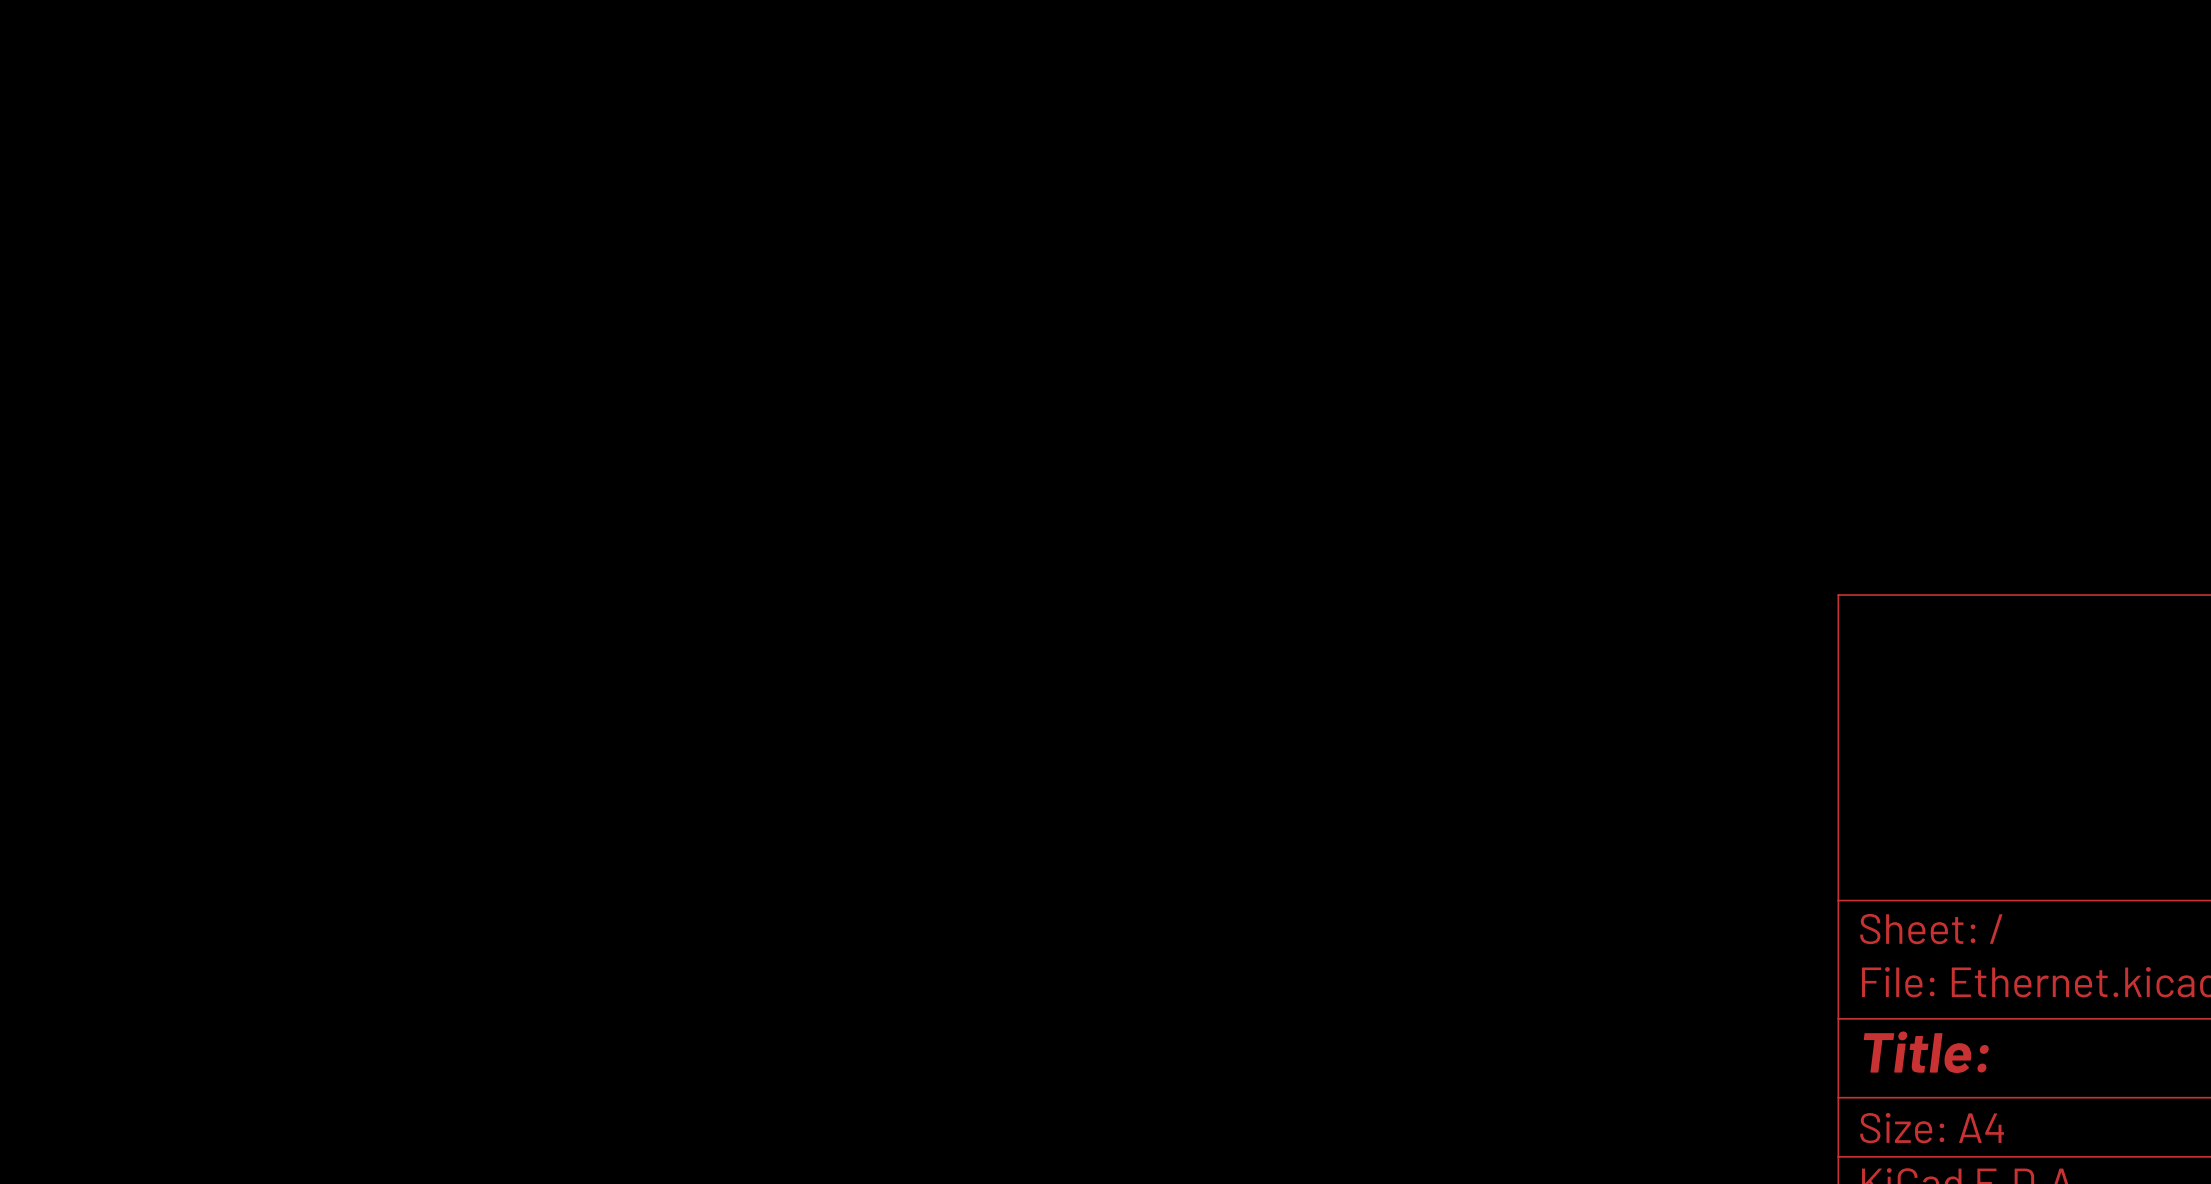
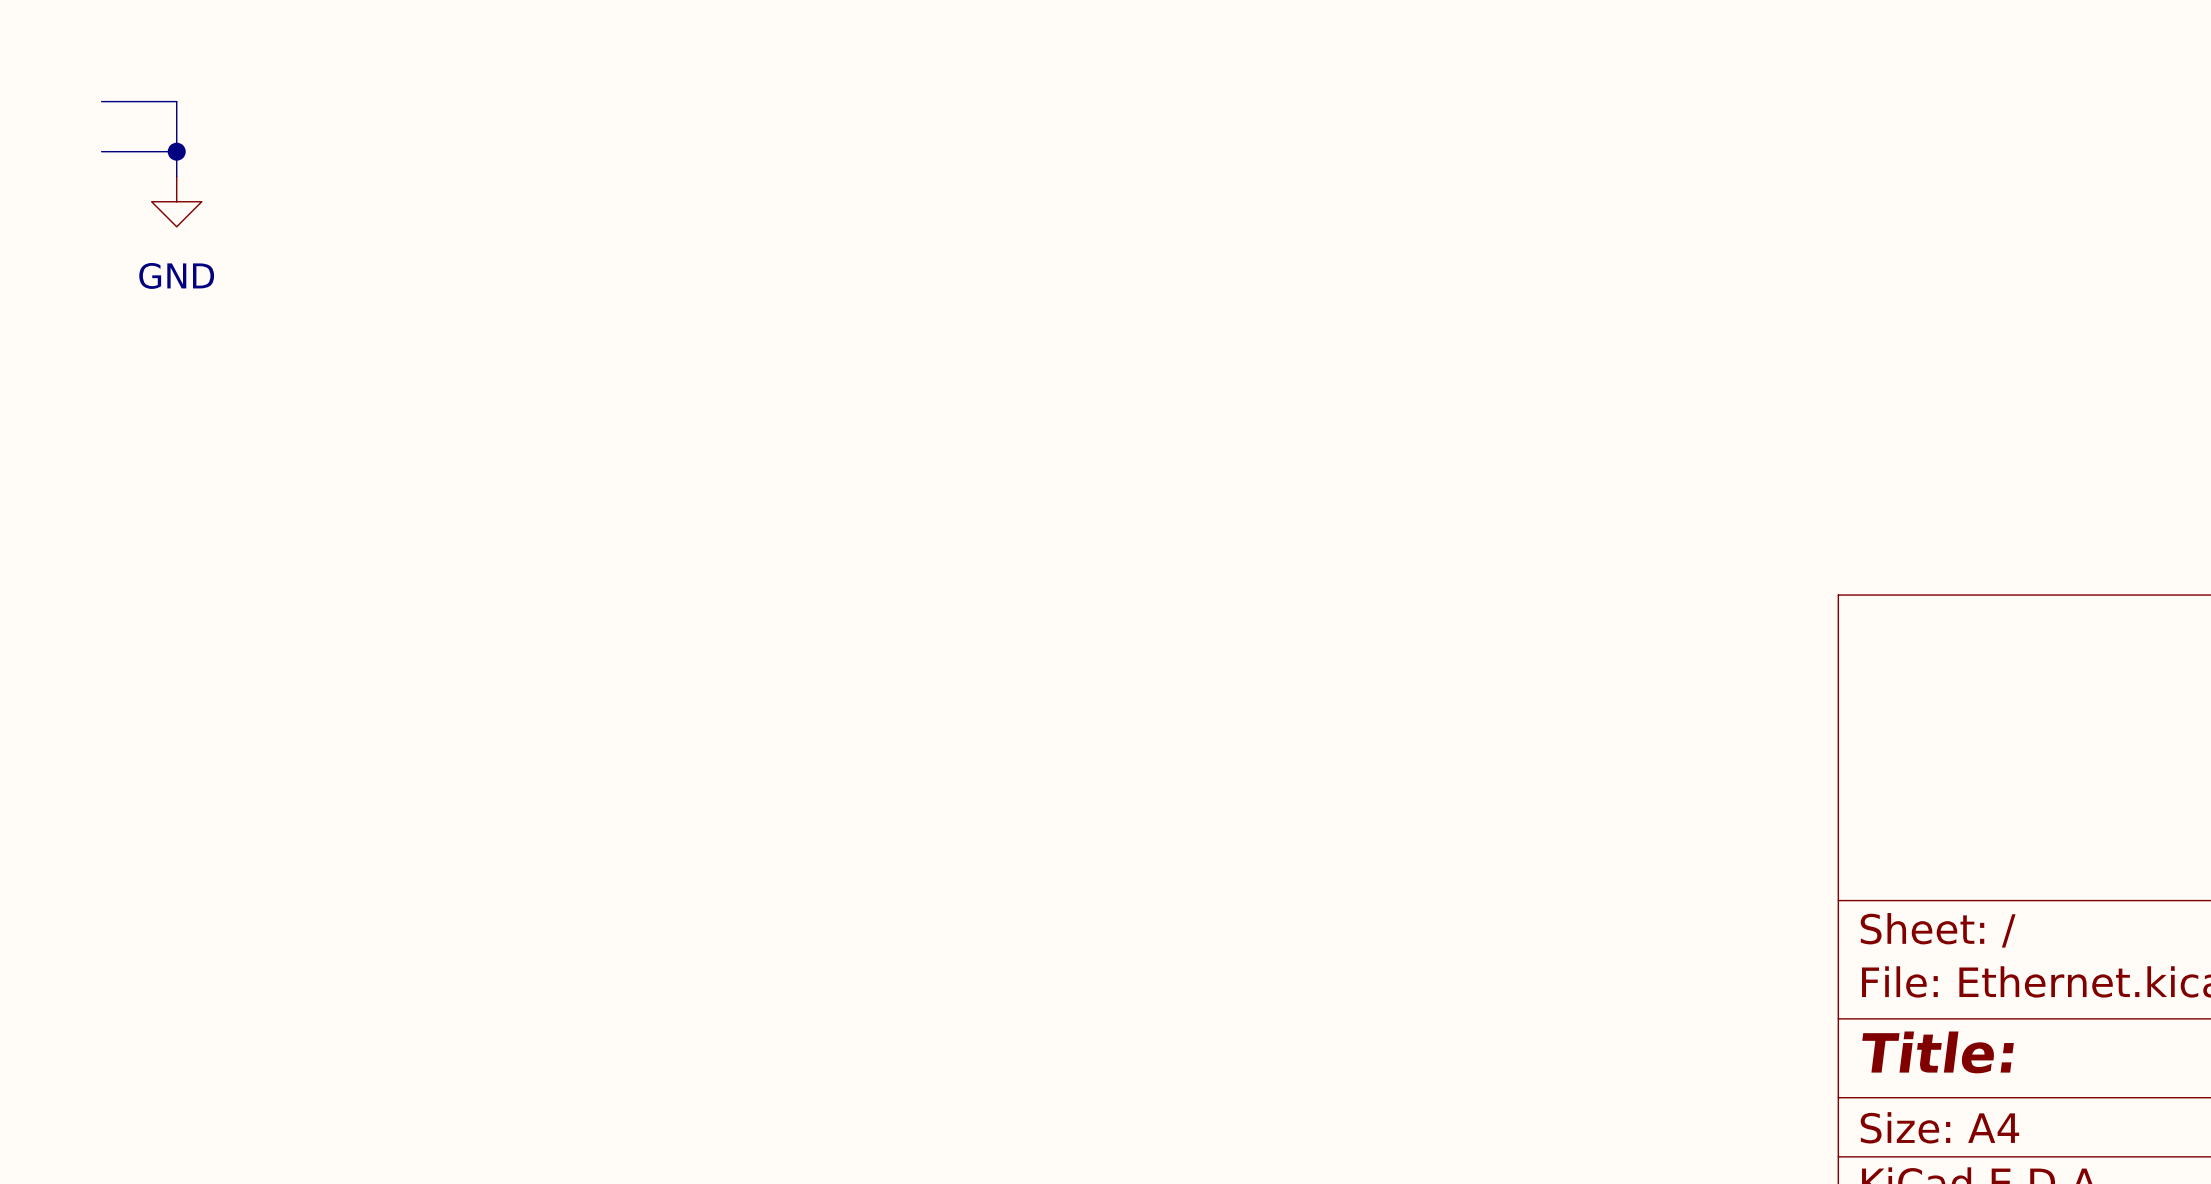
wire: none -> (101, 101) (176, 101) (176, 176)
wire: none -> (101, 151) (176, 151)
junction: none -> (176, 151)
power symbol: none -> GND (176, 201)

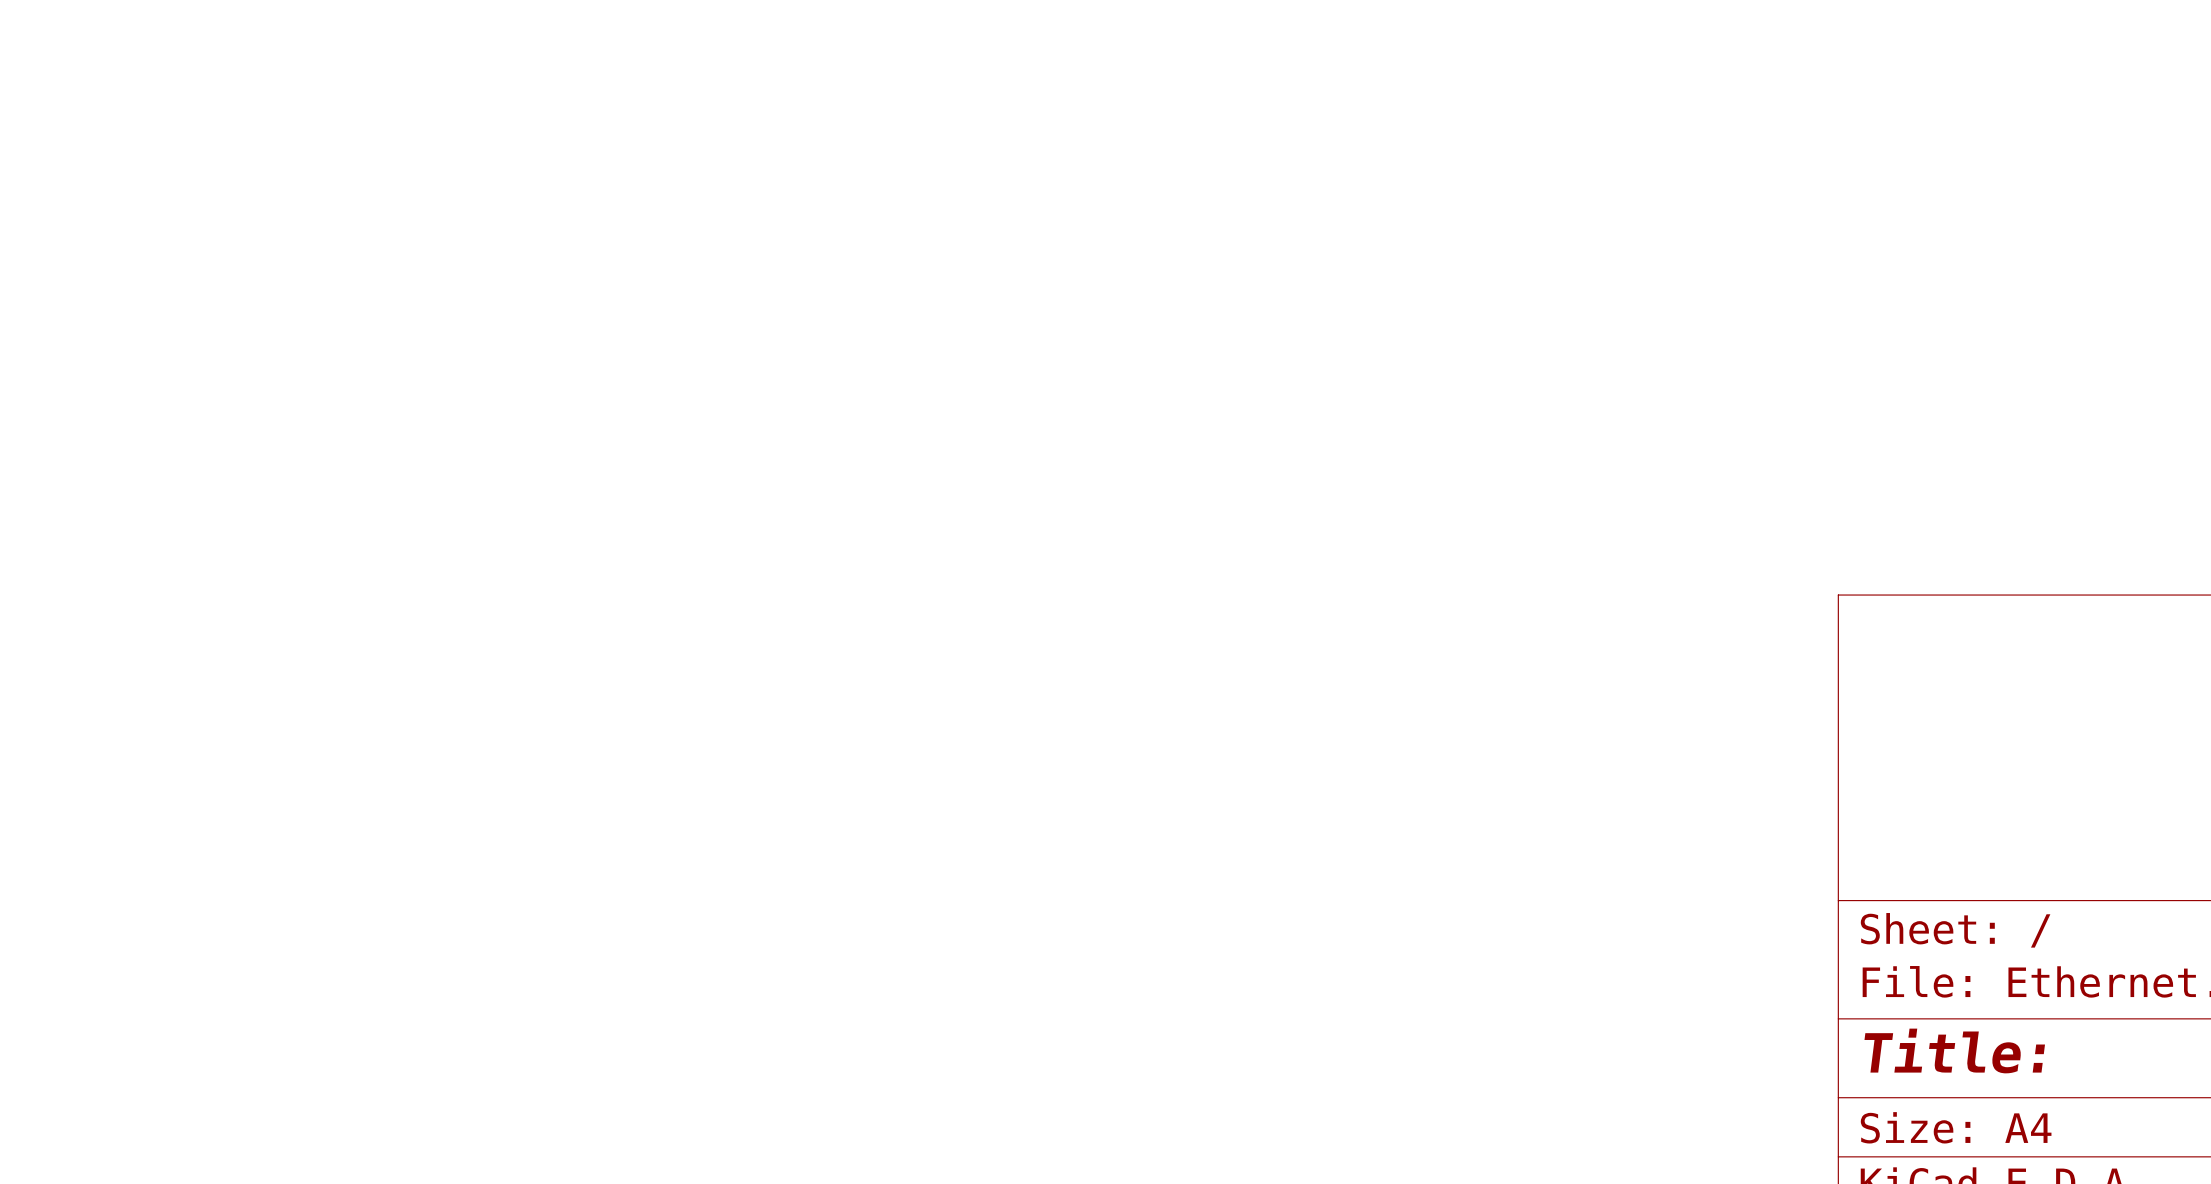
wire: (101, 101) (176, 101) (176, 176) -> none
wire: (101, 151) (176, 151) -> none
junction: (176, 151) -> none
power symbol: GND (176, 201) -> none

